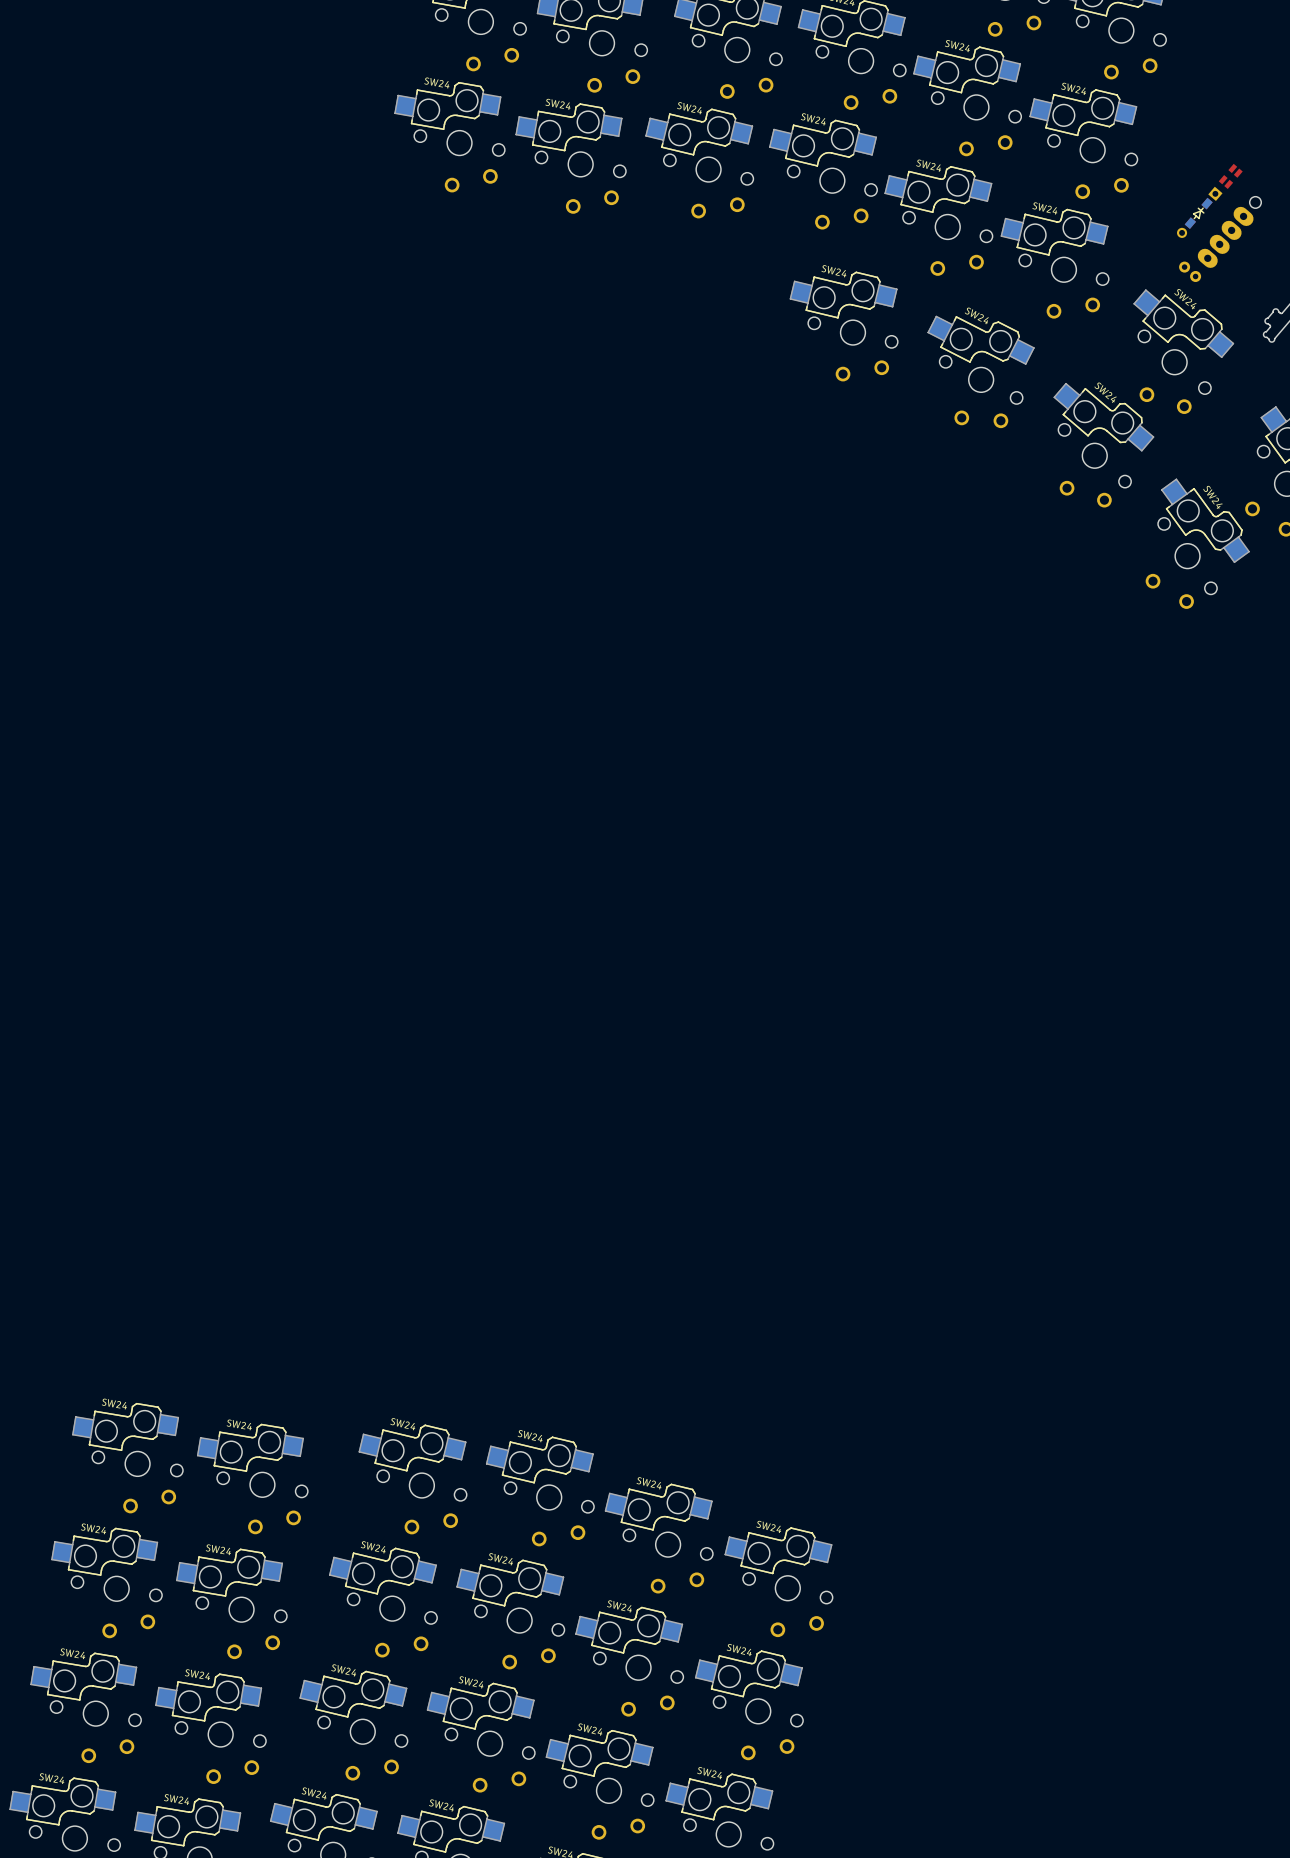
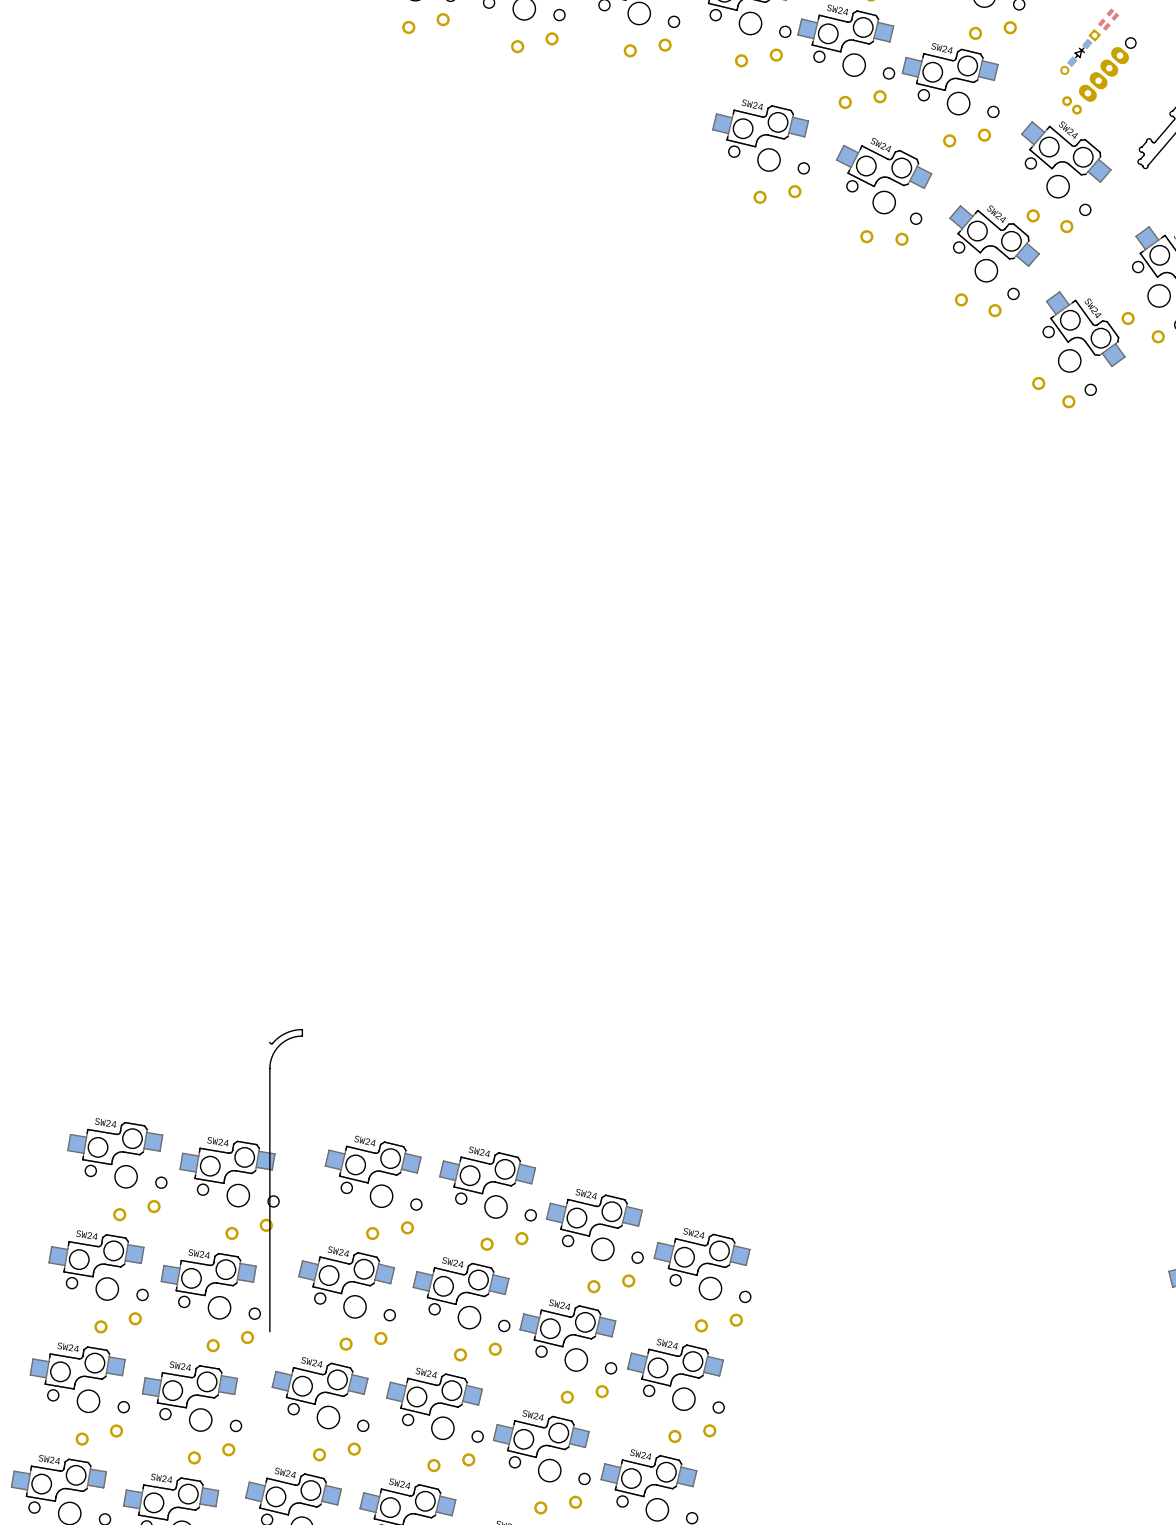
board edge: none -> (269, 1042) (272, 1043) (289, 1031) (302, 1029) (302, 1036) (288, 1039) (279, 1045) (273, 1054) (270, 1064) (269, 1331)

